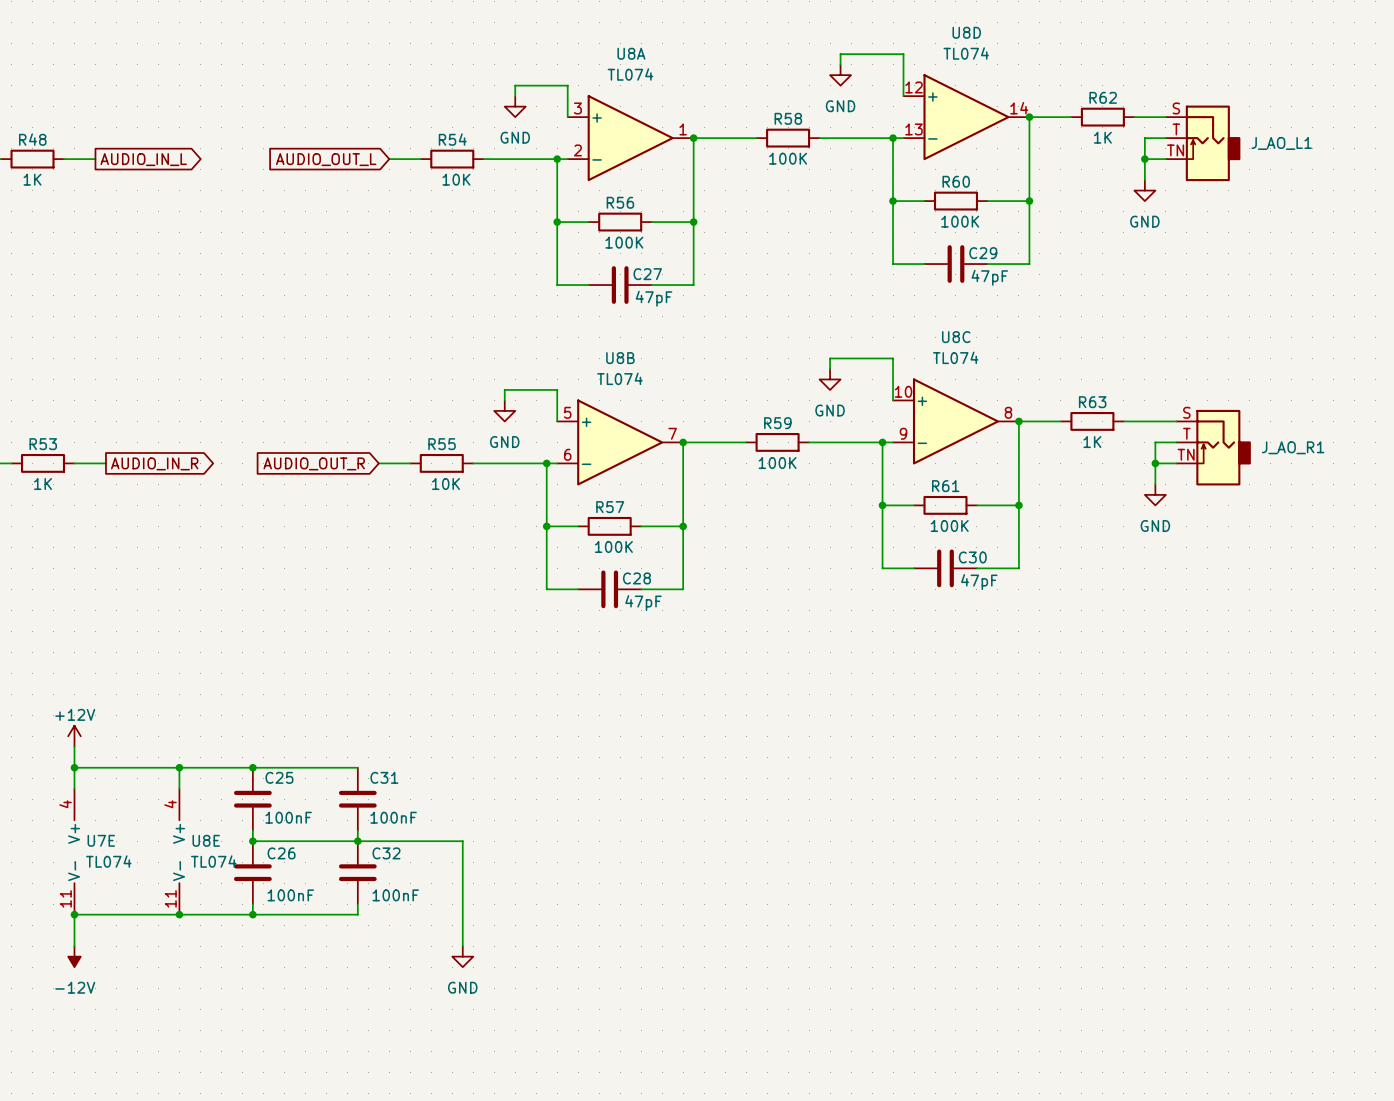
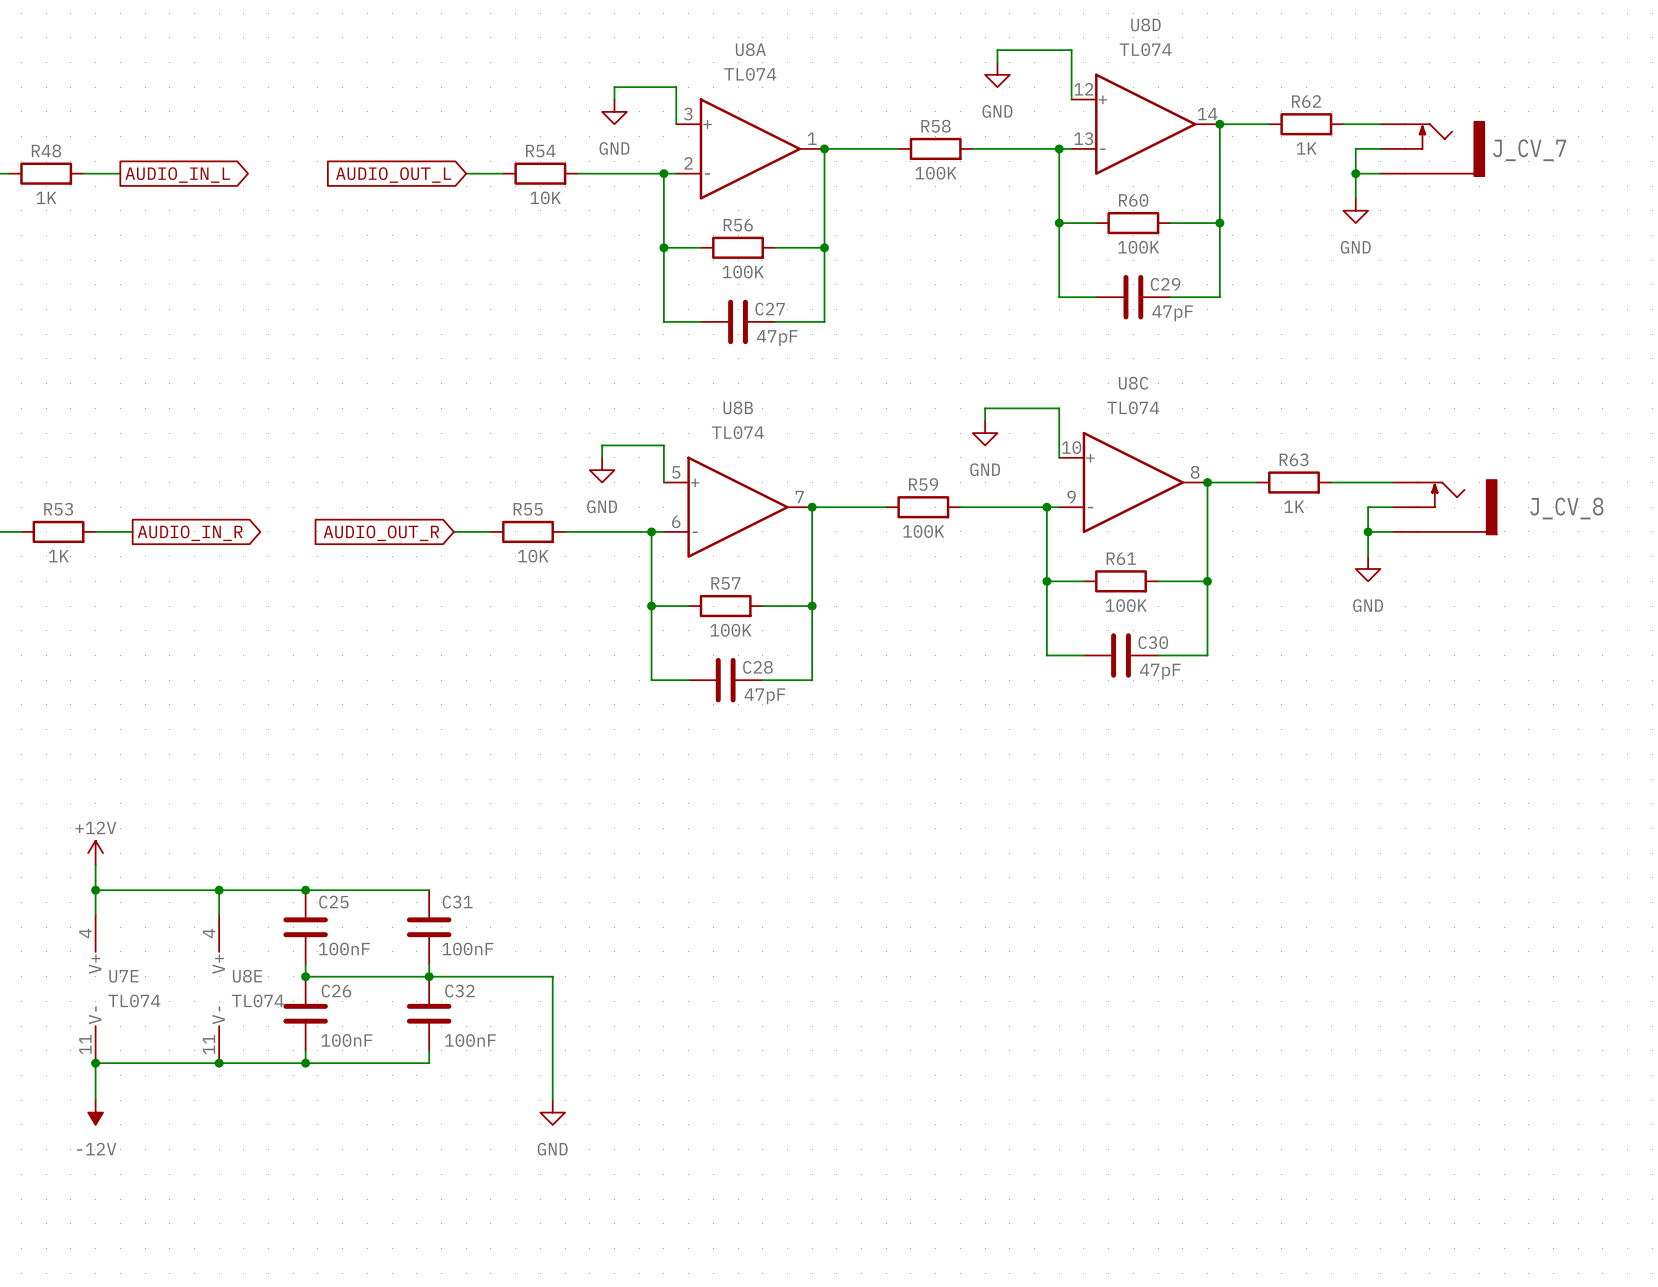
J_CV_7: none -> (1432, 148)
J_AO_L1: (1203, 143) -> none
J_CV_8: none -> (1444, 507)
J_AO_R1: (1213, 447) -> none

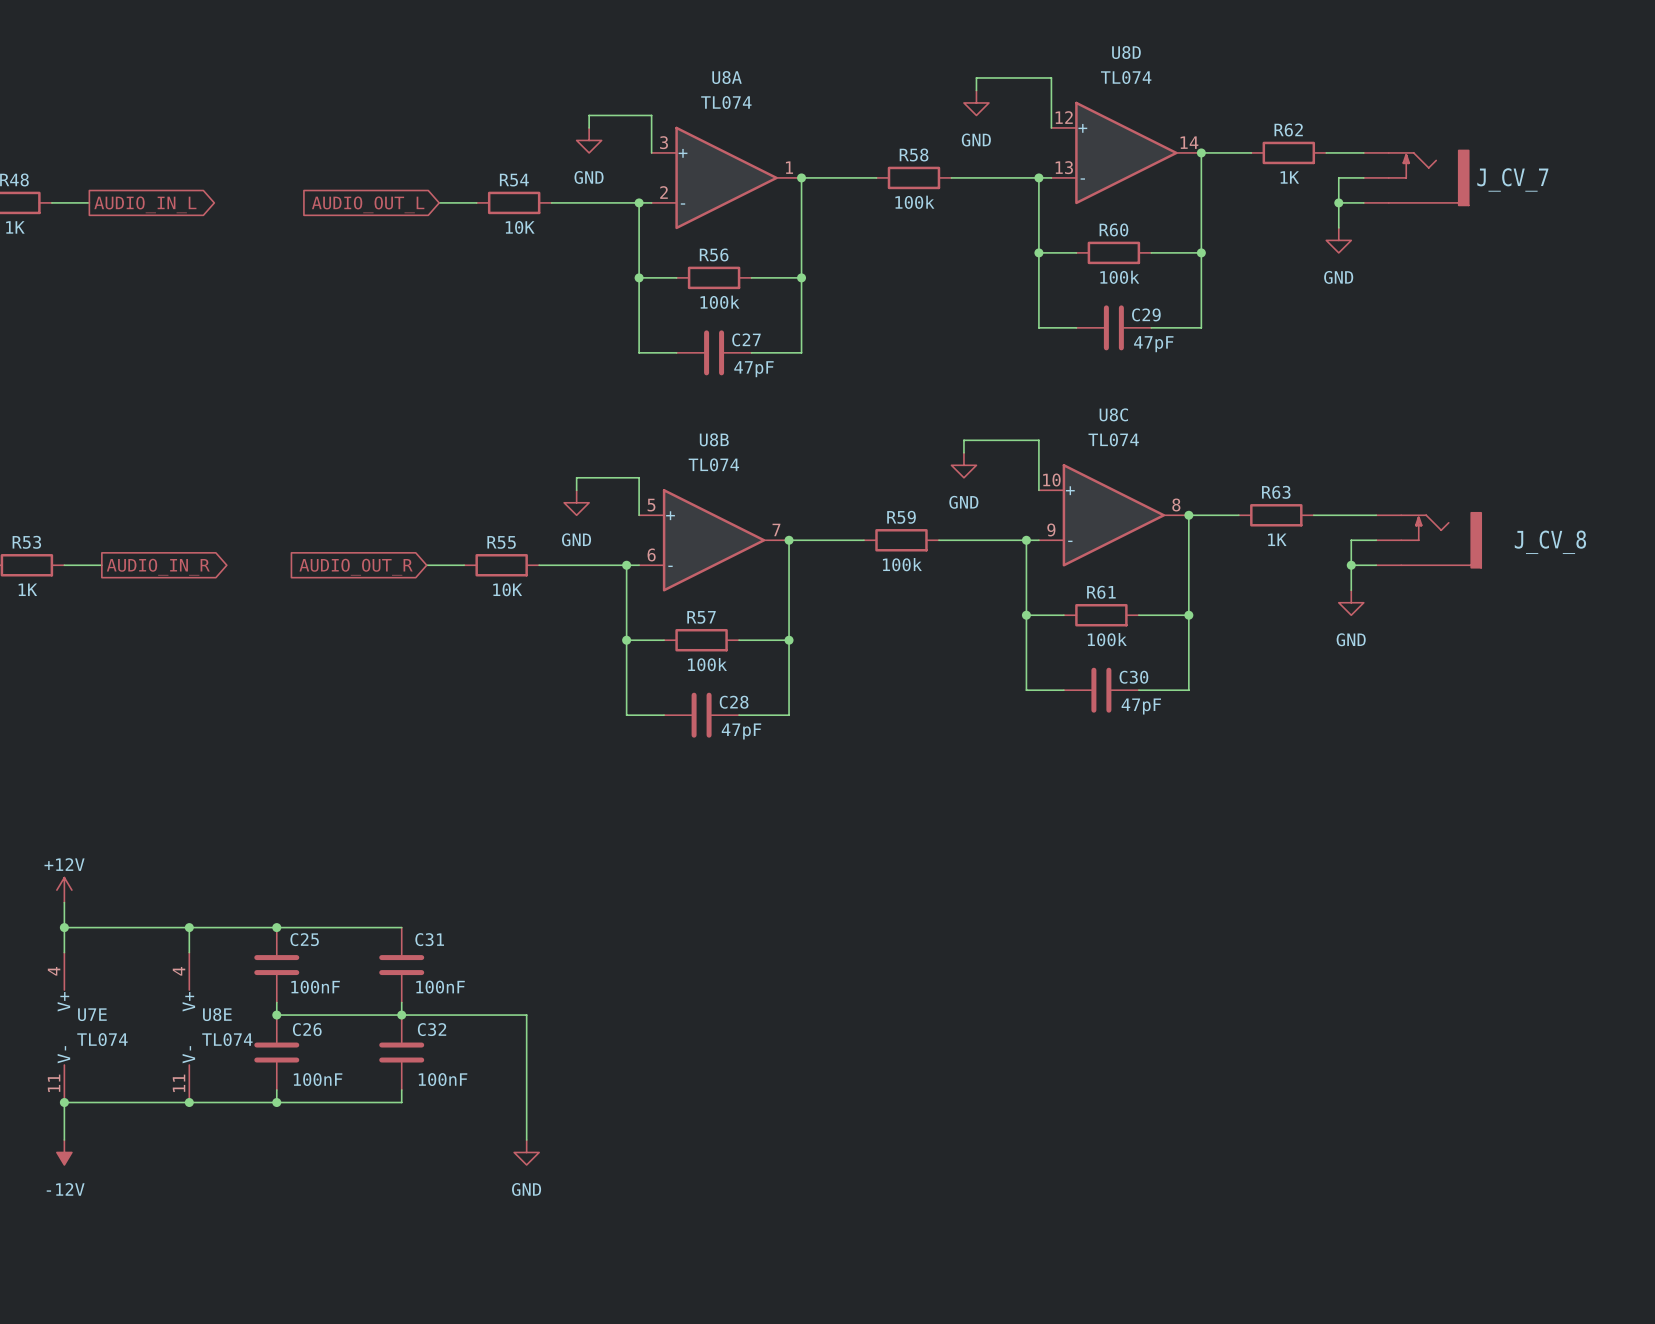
R58 value: 100K (935, 173) -> 100k (914, 202)
R60 value: 100K (1138, 247) -> 100k (1119, 277)
R56 value: 100K (743, 272) -> 100k (719, 302)
R59 value: 100K (923, 531) -> 100k (902, 564)
R61 value: 100K (1126, 605) -> 100k (1107, 639)
R57 value: 100K (730, 630) -> 100k (707, 664)

